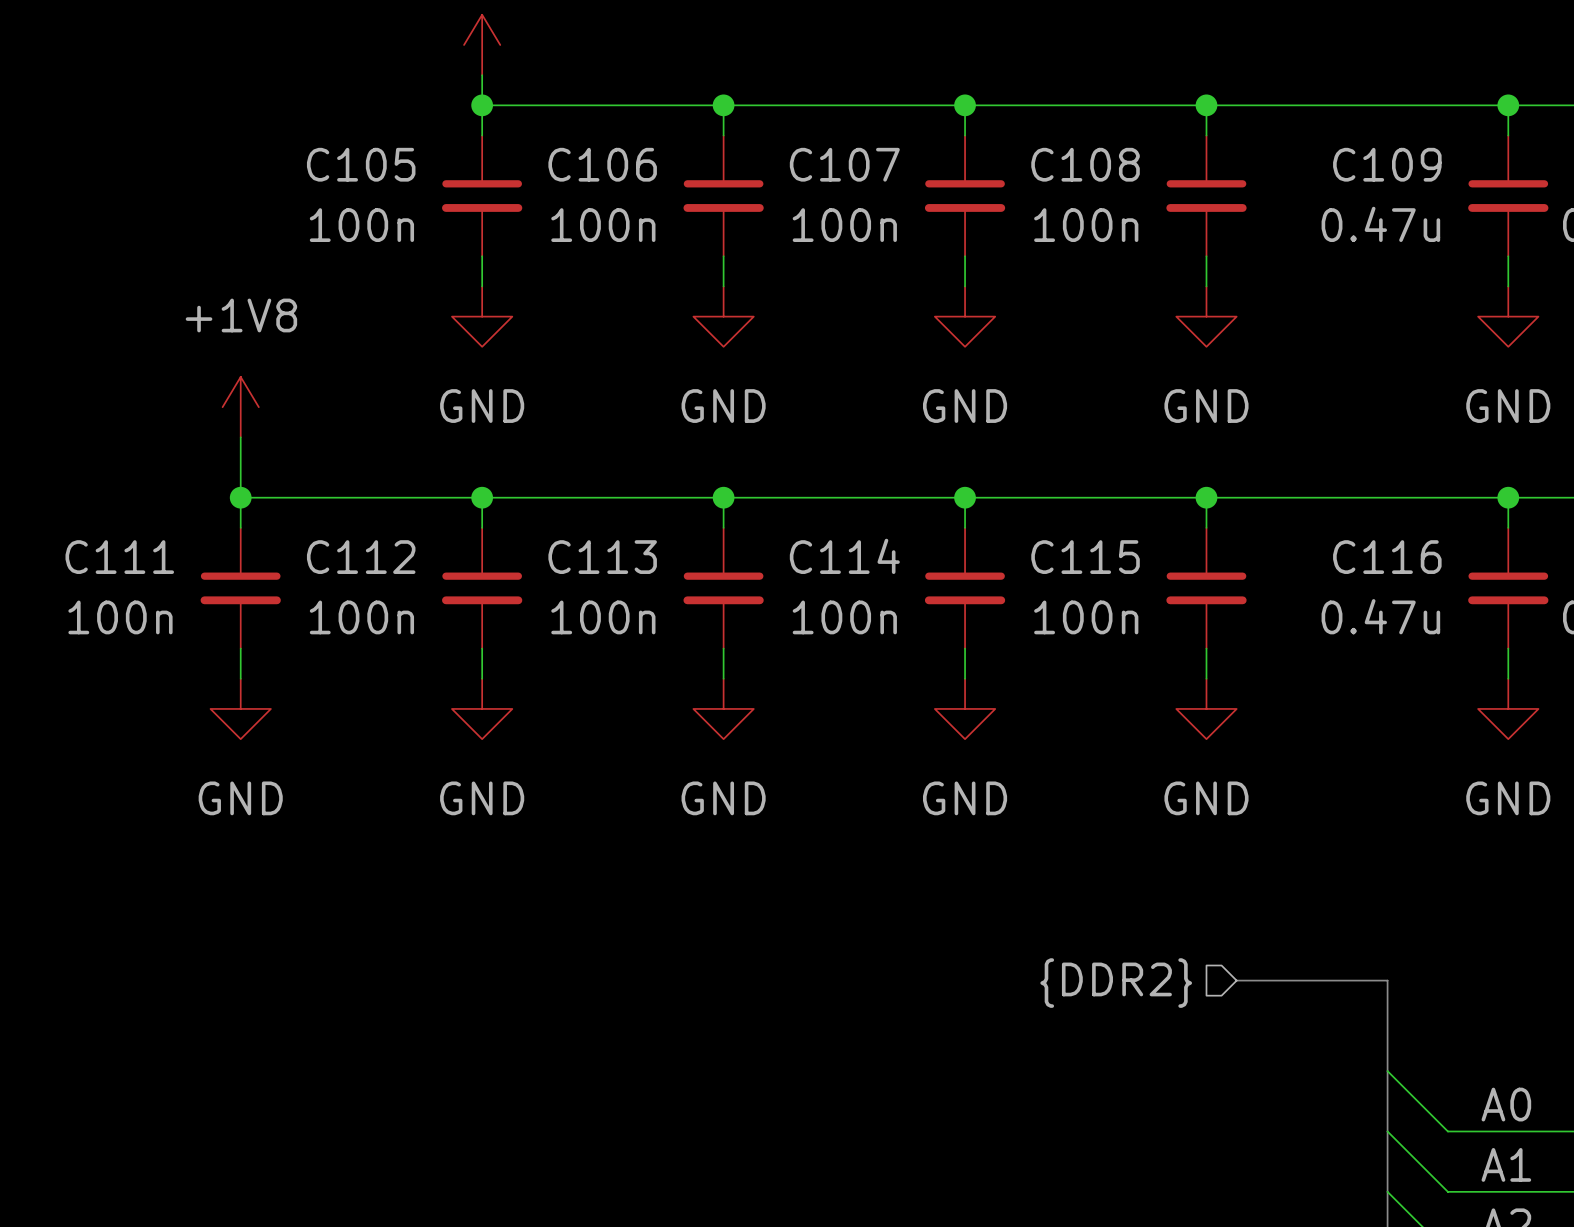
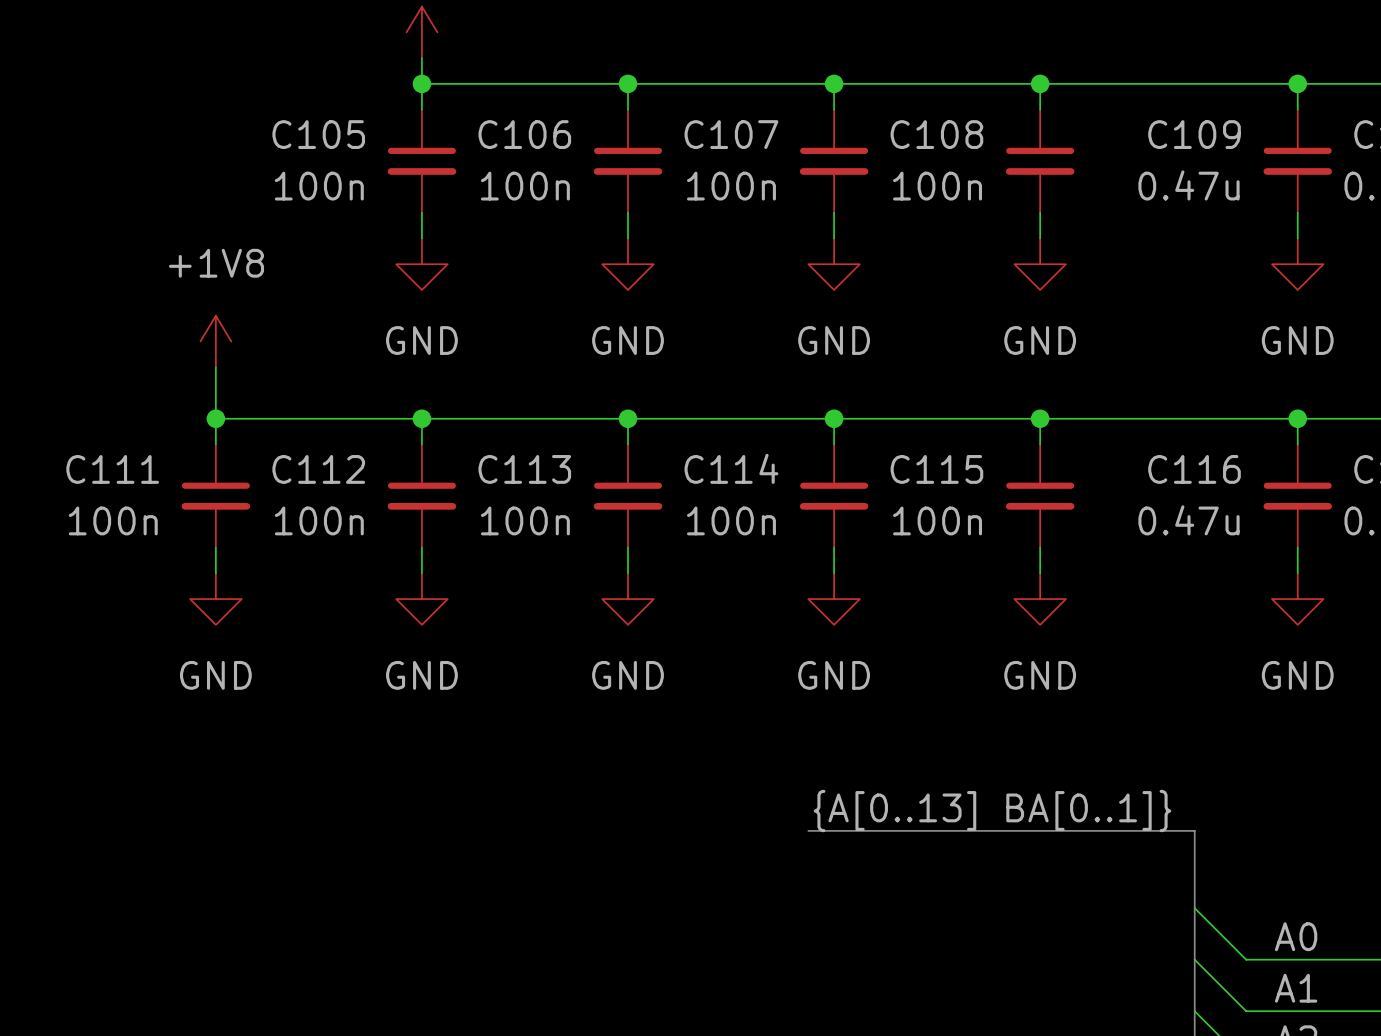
label: none -> {A[0..13] BA[0..1]} (992, 810)
bus: none -> (808, 830) (1065, 830)
hierarchical label: {DDR2} (1116, 983) -> none

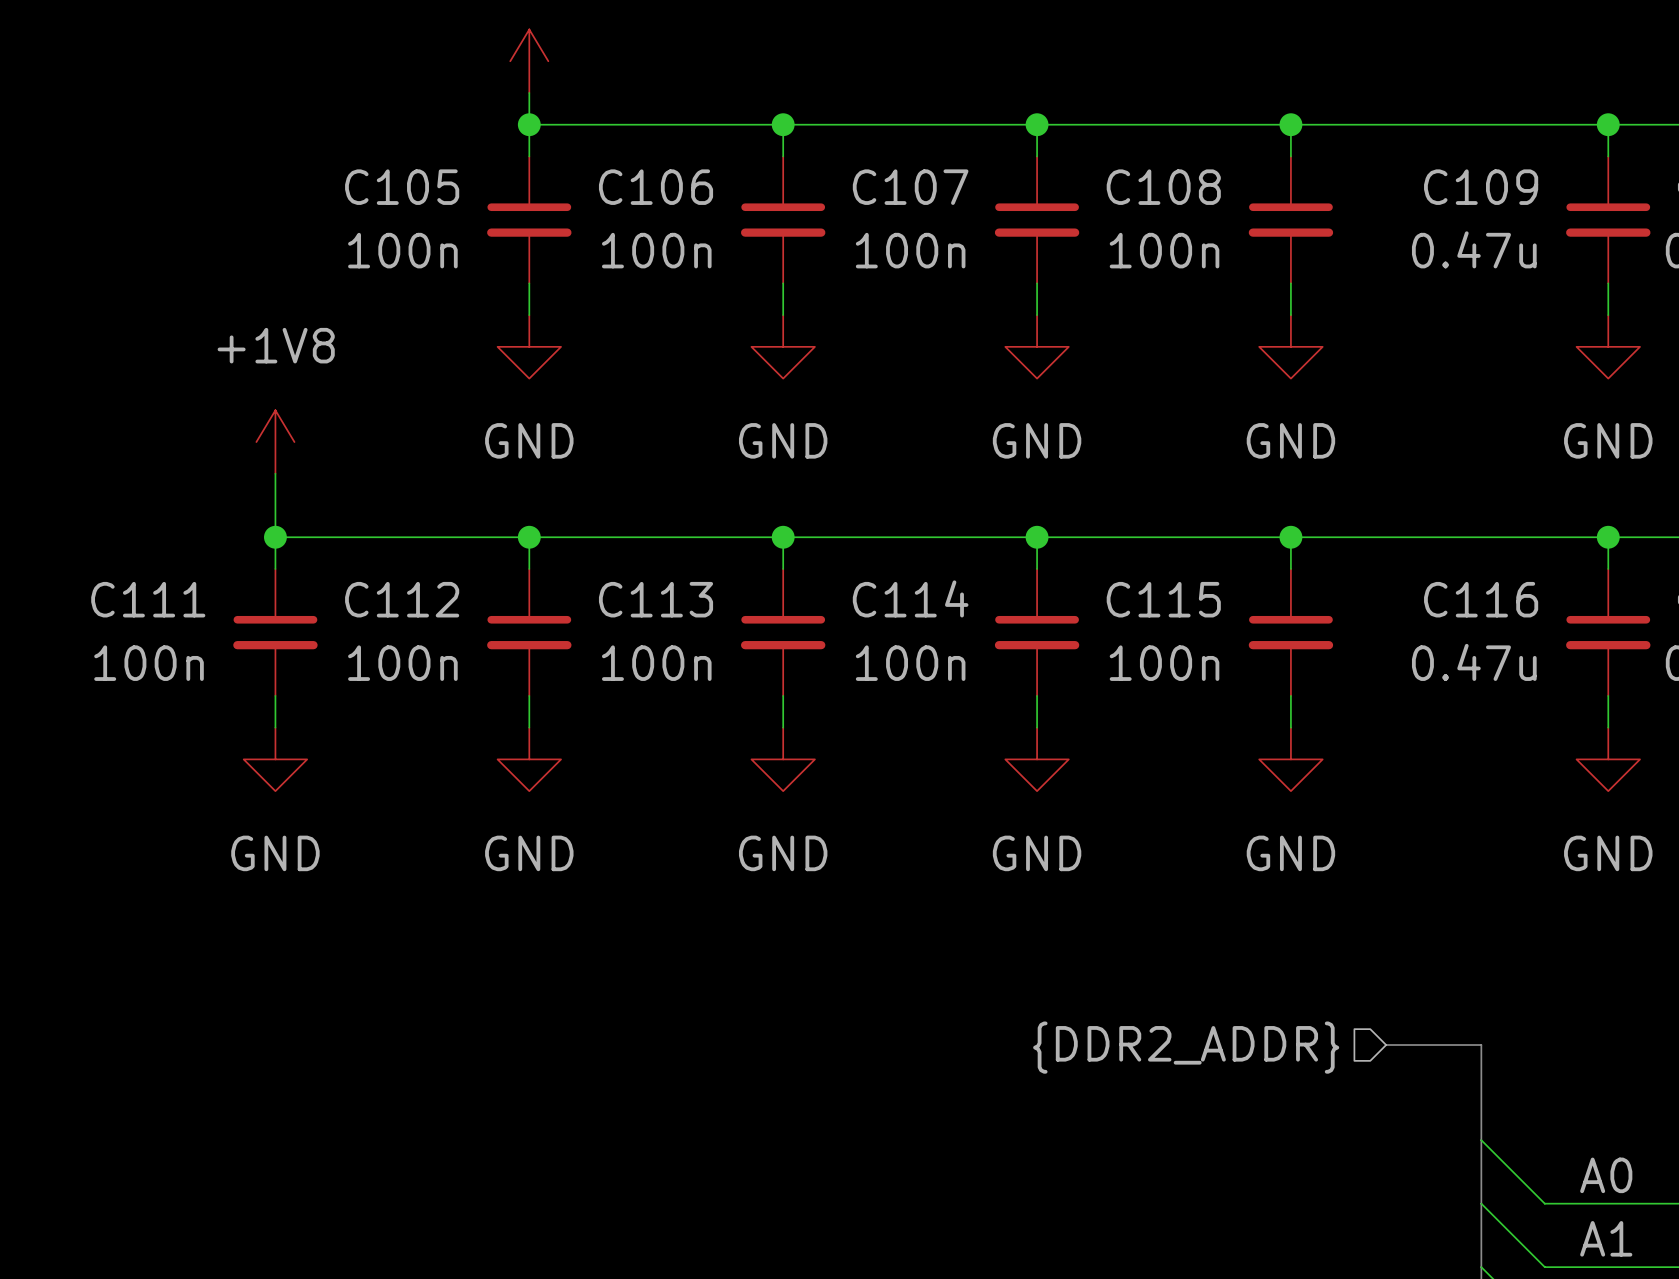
label: {A[0..13] BA[0..1]} (992, 810) -> none
bus: (808, 830) (1117, 830) -> none
hierarchical label: none -> {DDR2_ADDR} (1186, 1047)

